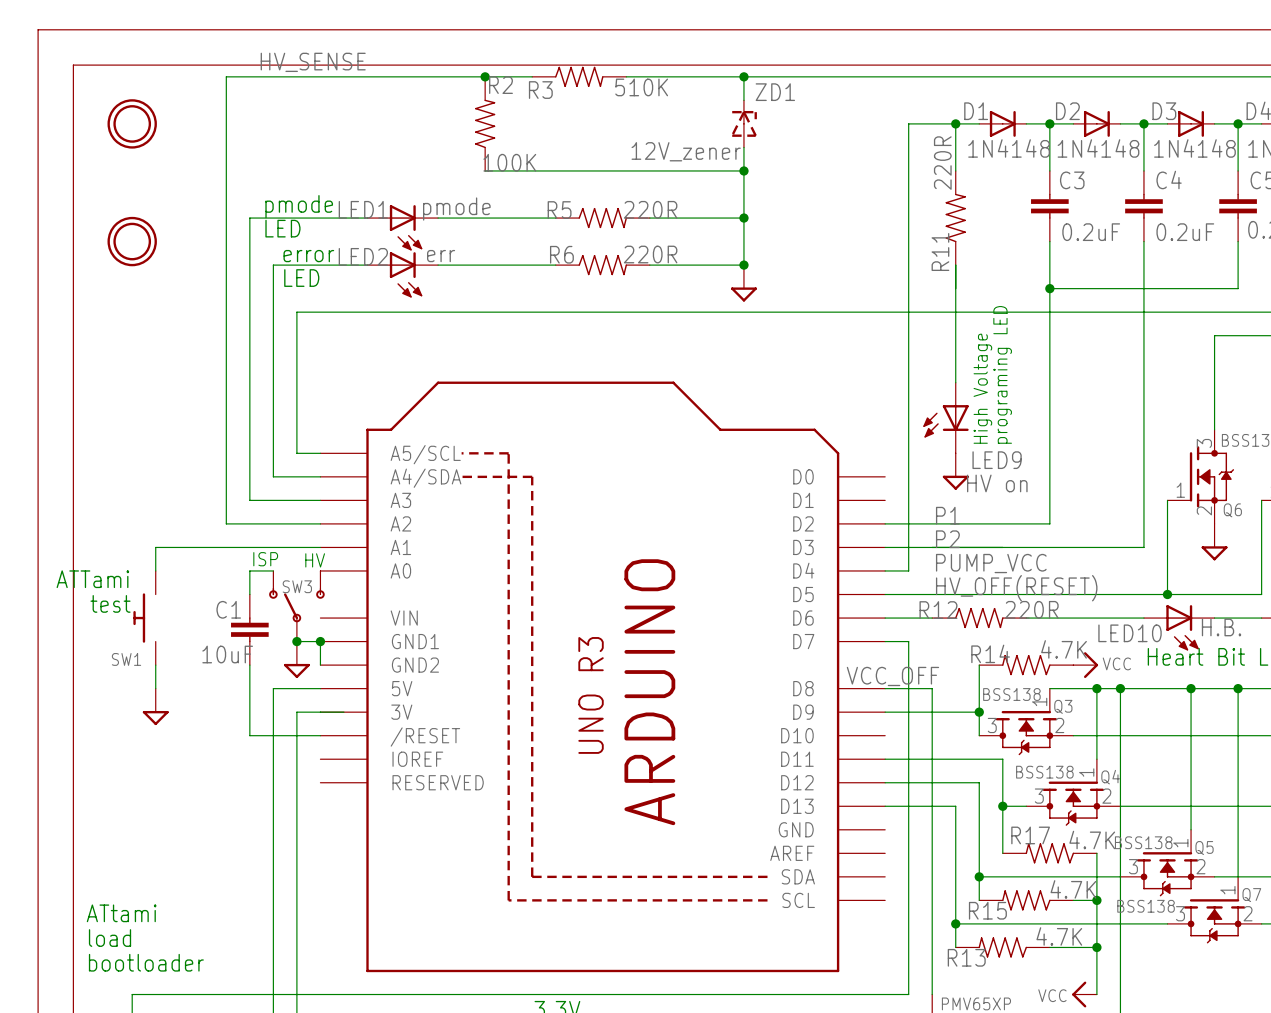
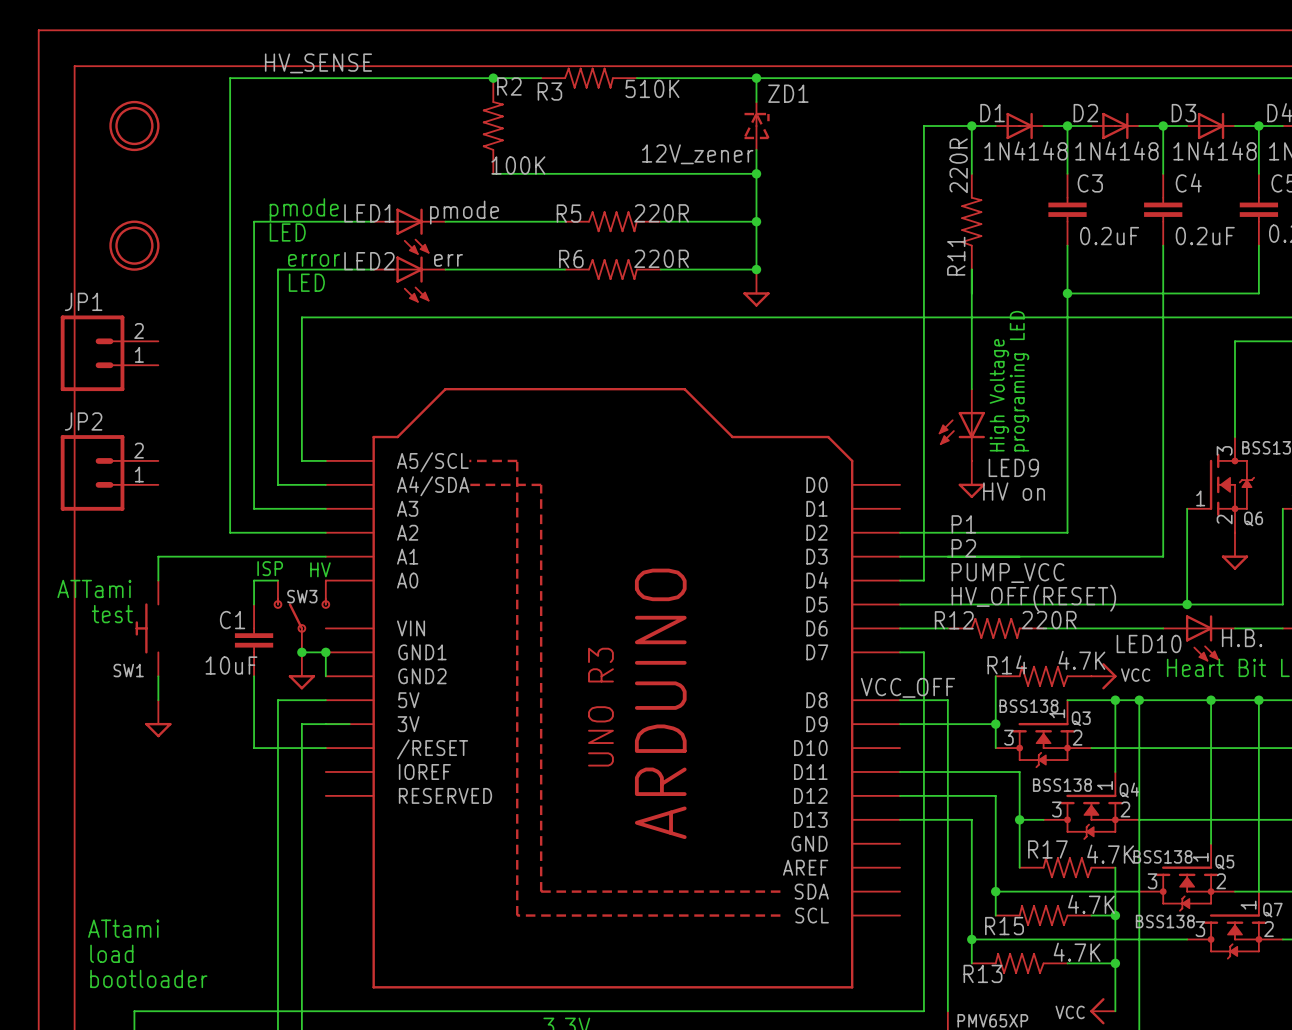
JP1: none -> (109, 353)
JP2: none -> (109, 472)

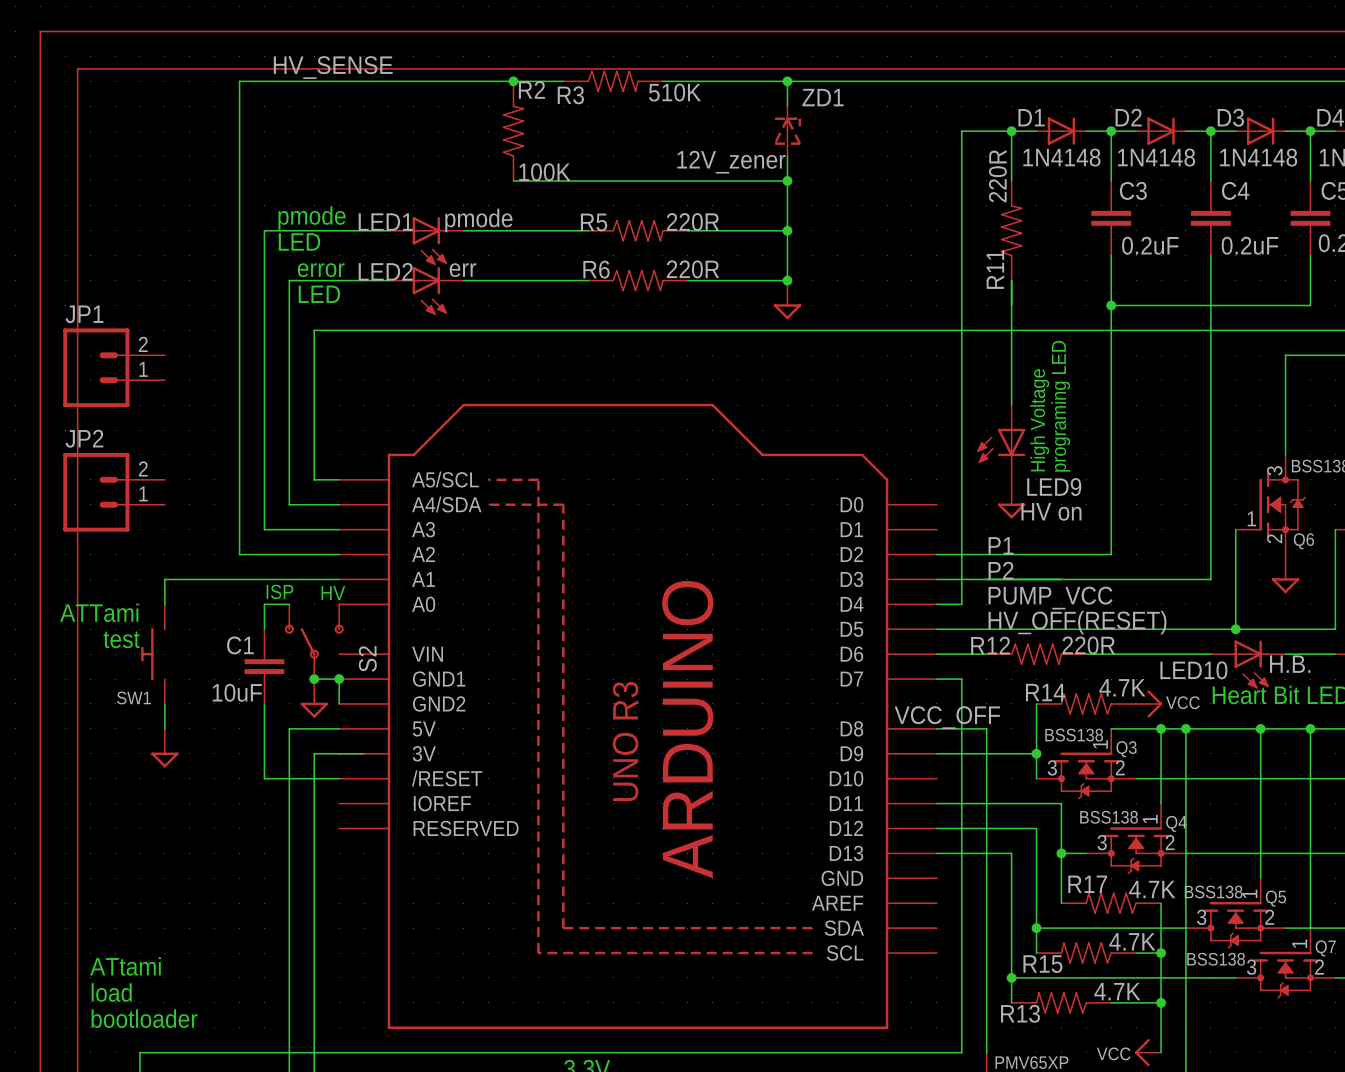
part: (134, 126) -> none
part: (134, 245) -> none
SW3 name: SW3 (302, 596) -> S2 (367, 658)

